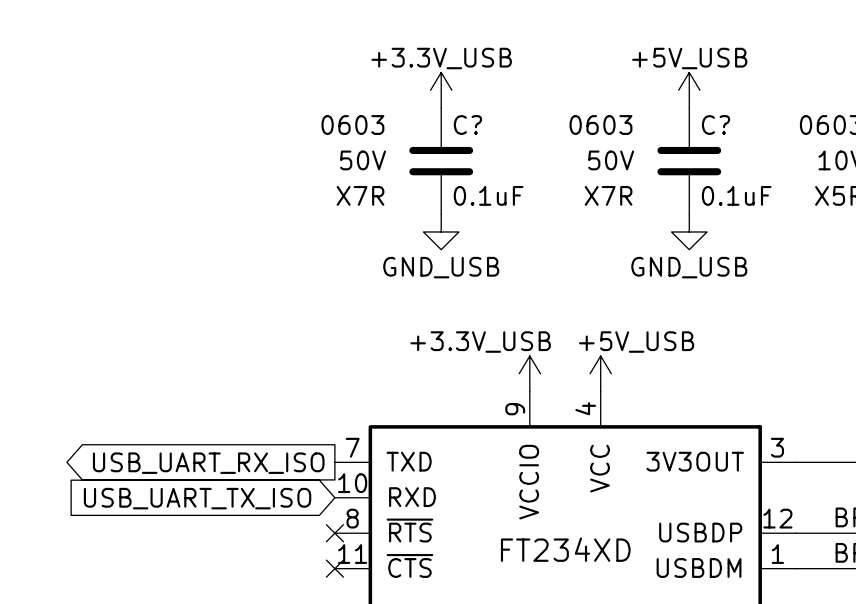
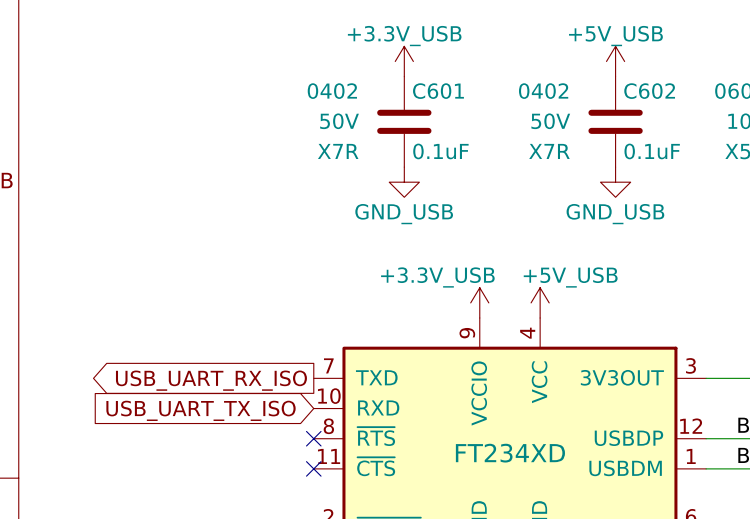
C? text: 0603 (352, 125) -> 0402 (332, 91)
C? name: C? (467, 125) -> C601 (438, 91)
C? text: 0603 (600, 125) -> 0402 (543, 91)
C? name: C? (716, 125) -> C602 (649, 91)

